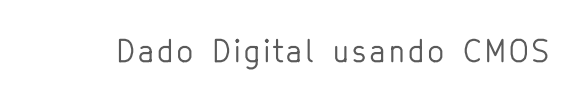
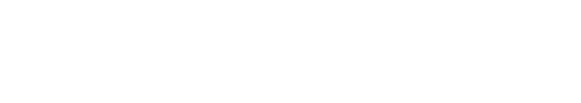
text: Dado Digital usando CMOS (333, 54) -> none

